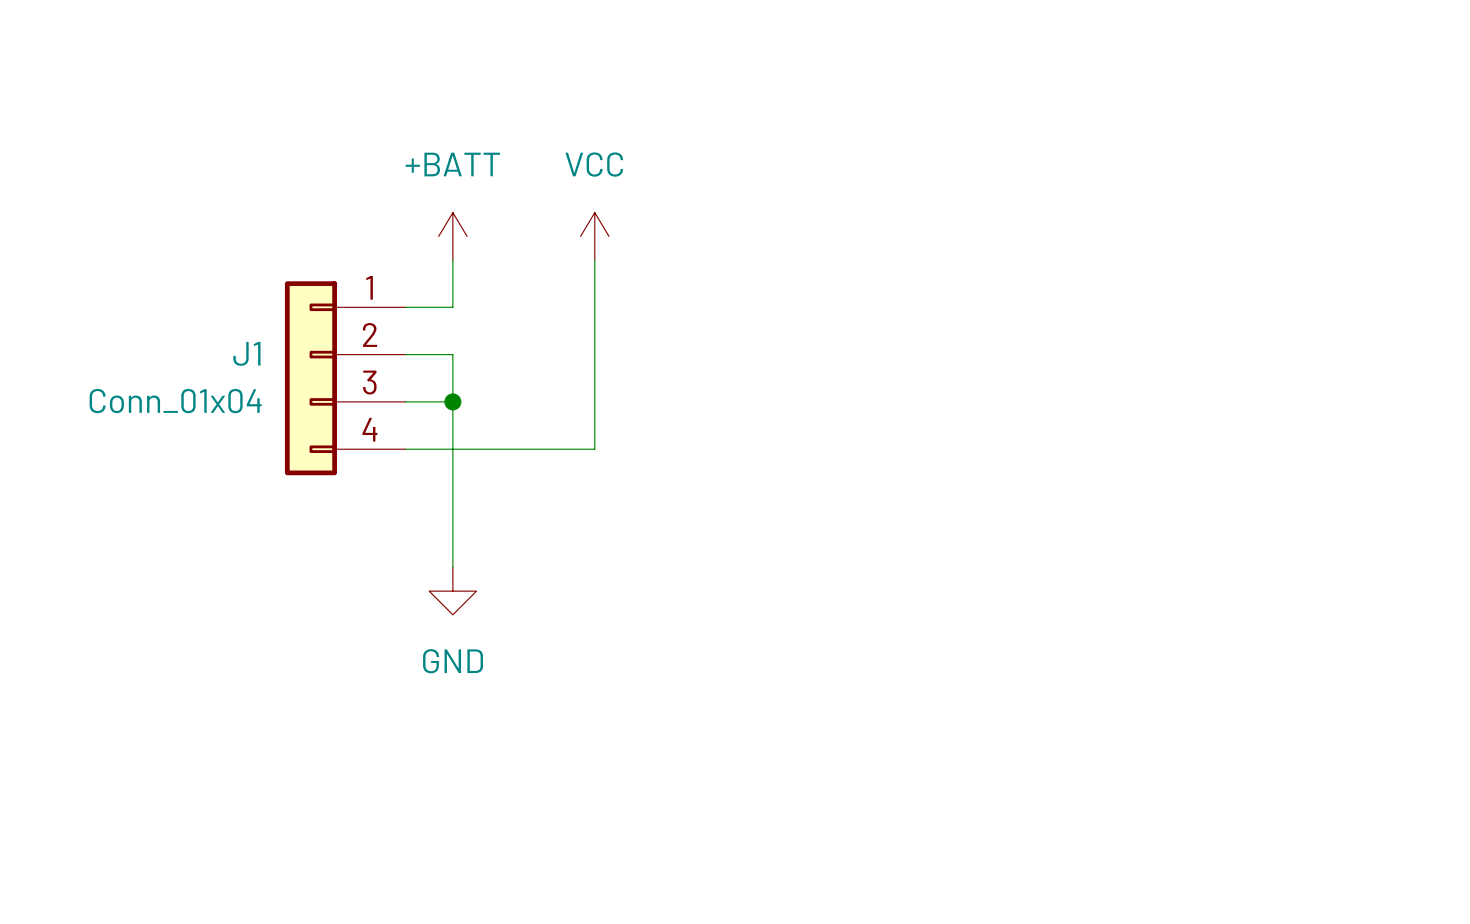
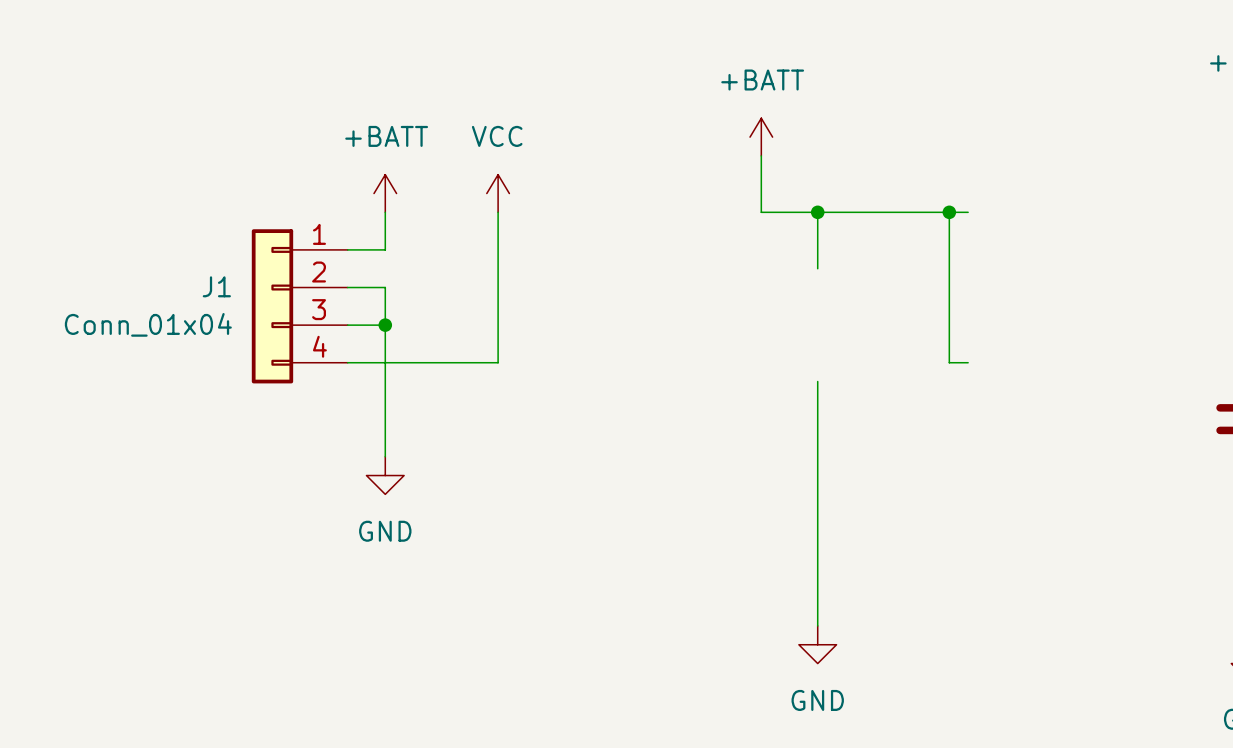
power symbol: none -> +BATT (761, 137)
wire: none -> (761, 155) (761, 212) (968, 212)
wire: none -> (817, 212) (817, 268)
junction: none -> (817, 212)
wire: none -> (949, 212) (949, 362) (968, 362)
junction: none -> (949, 212)
wire: none -> (817, 381) (817, 625)
power symbol: none -> GND (817, 644)

